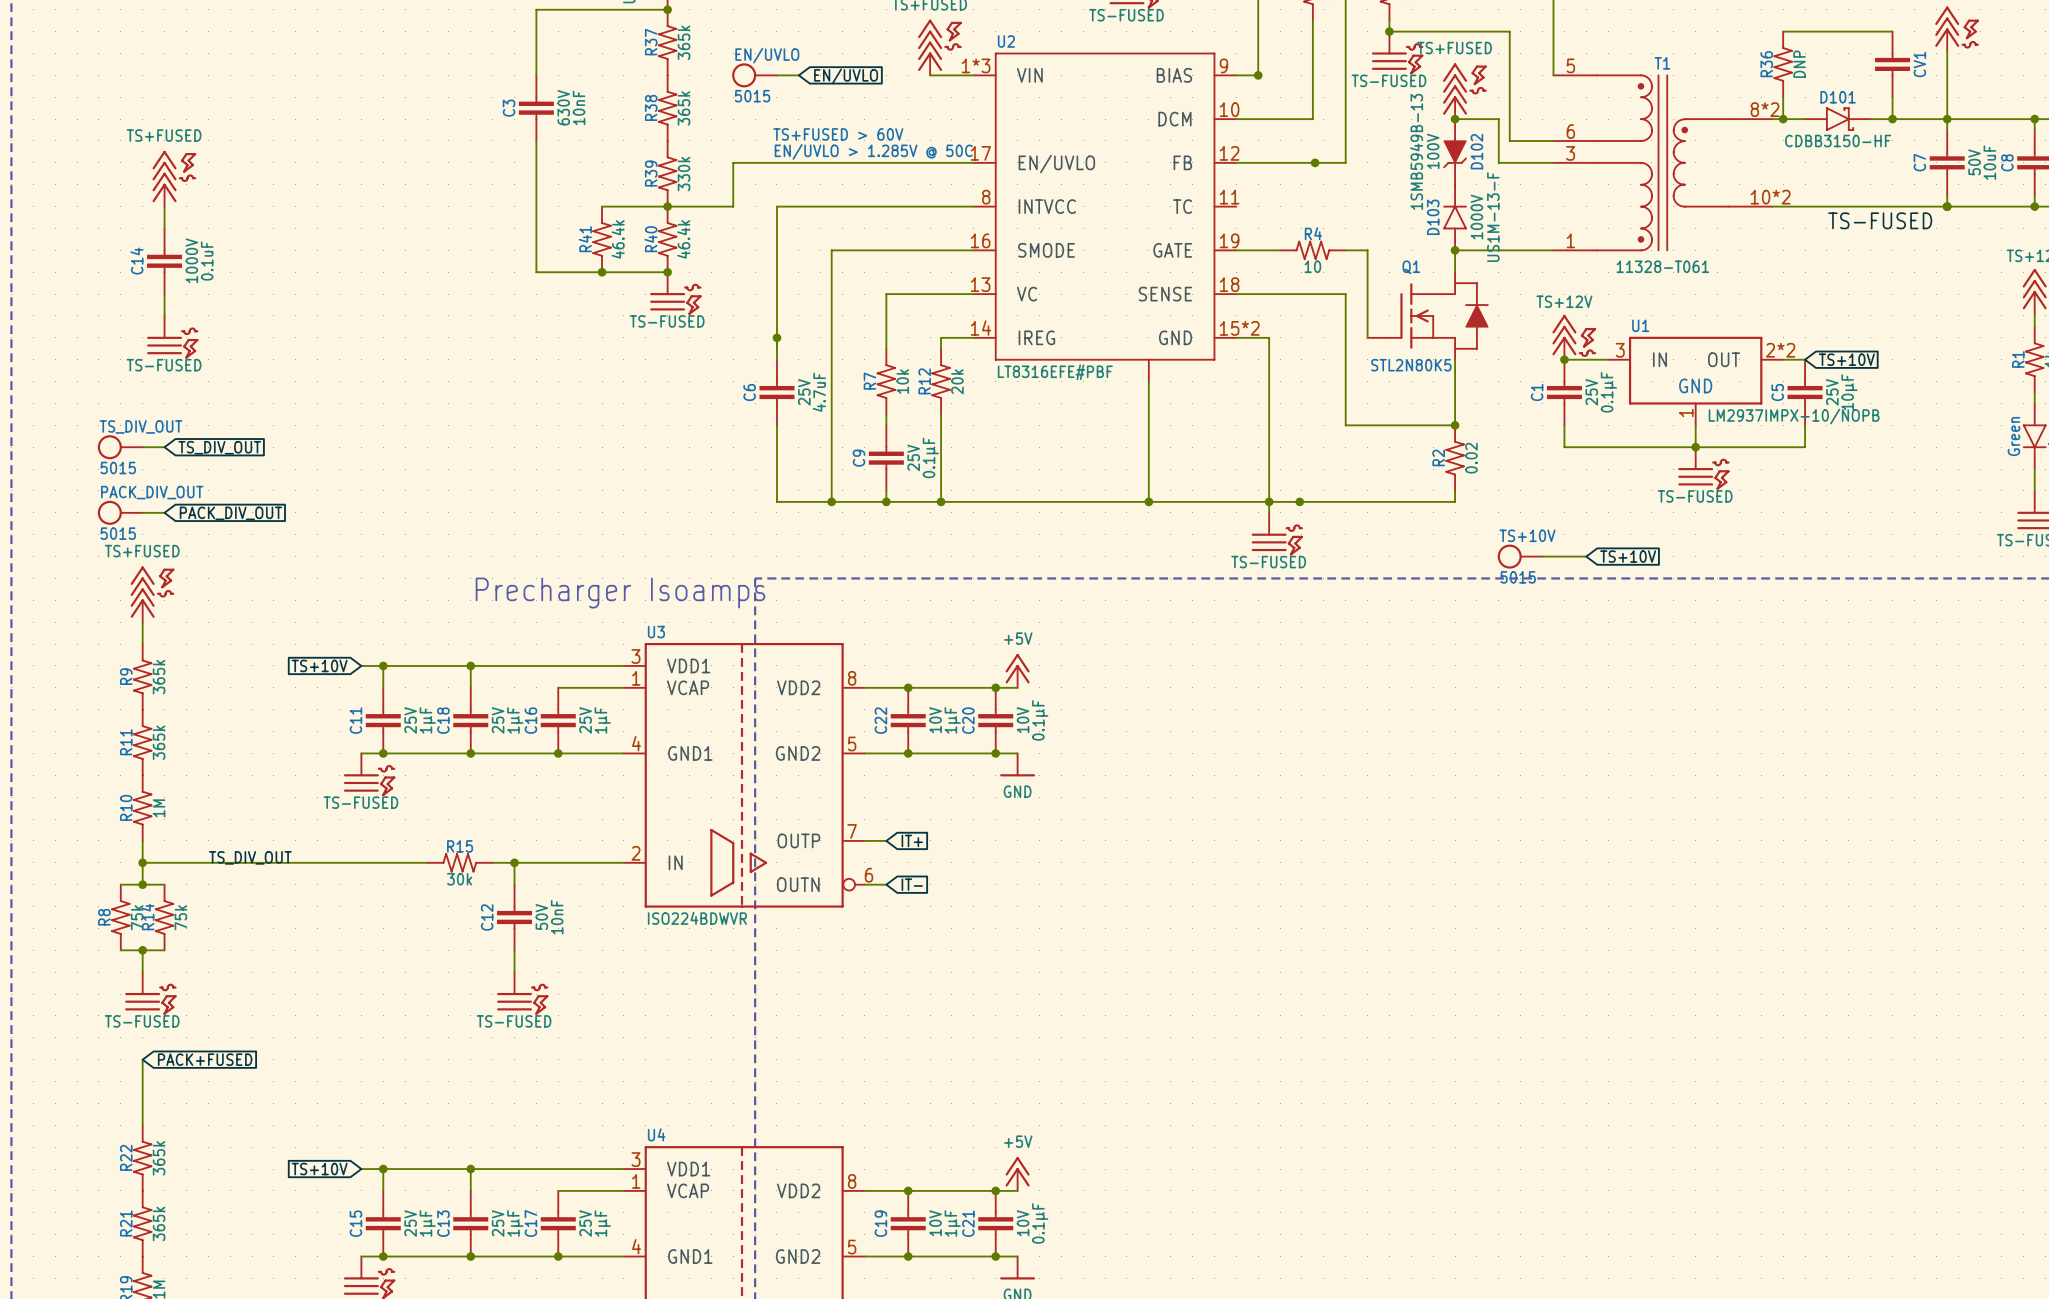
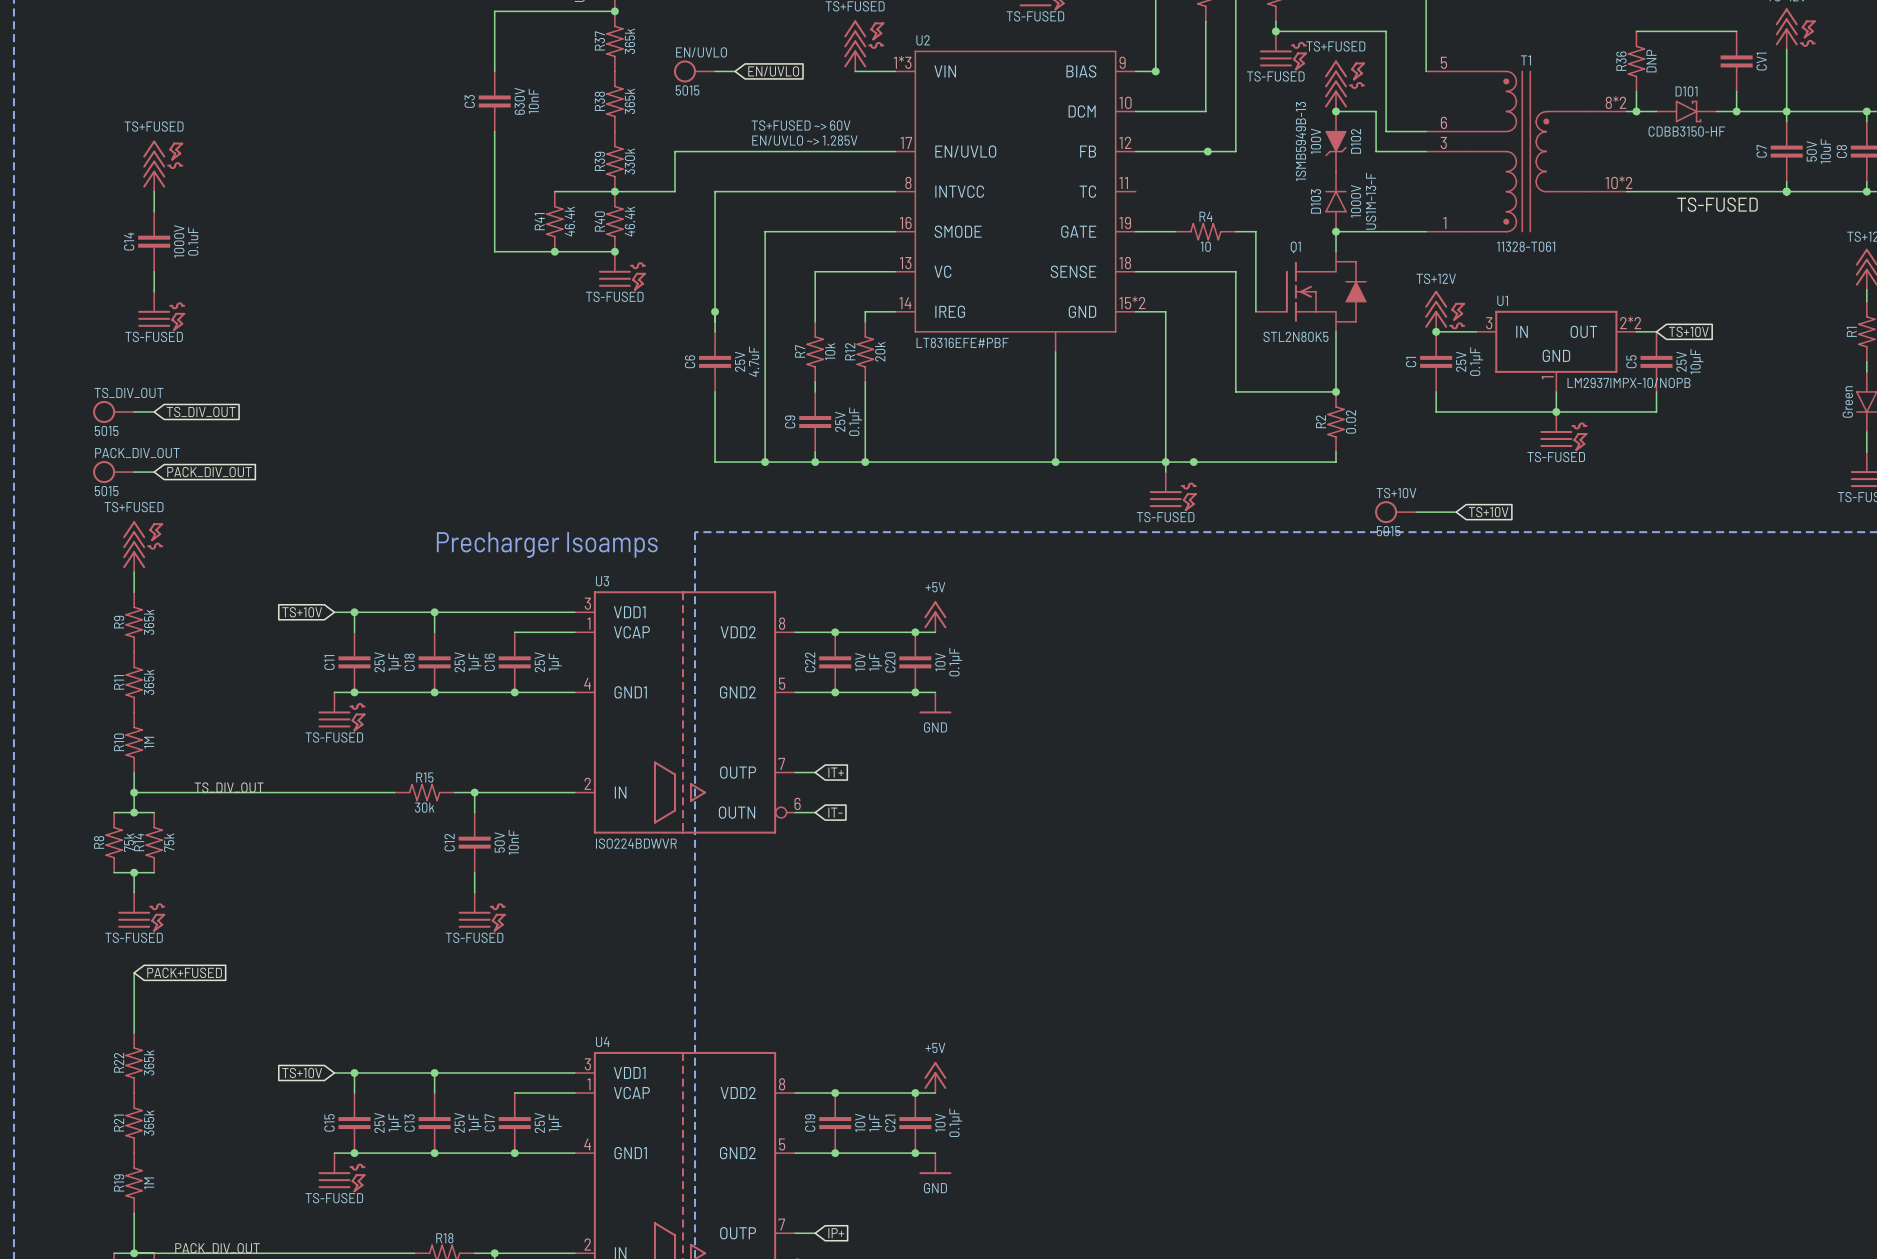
text: TS+FUSED > 60V (838, 134) -> TS+FUSED ~> 60V (801, 125)
text: EN/UVLO > 1.285V @ 50C (873, 151) -> EN/UVLO ~> 1.285V (804, 140)

